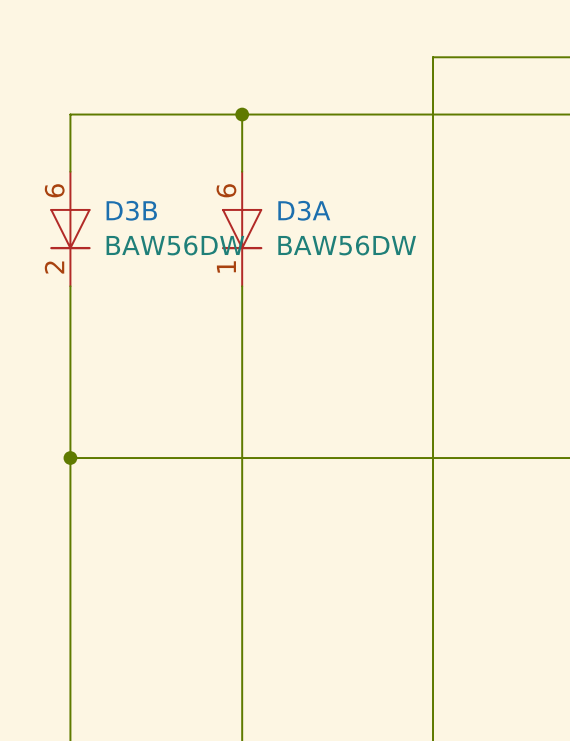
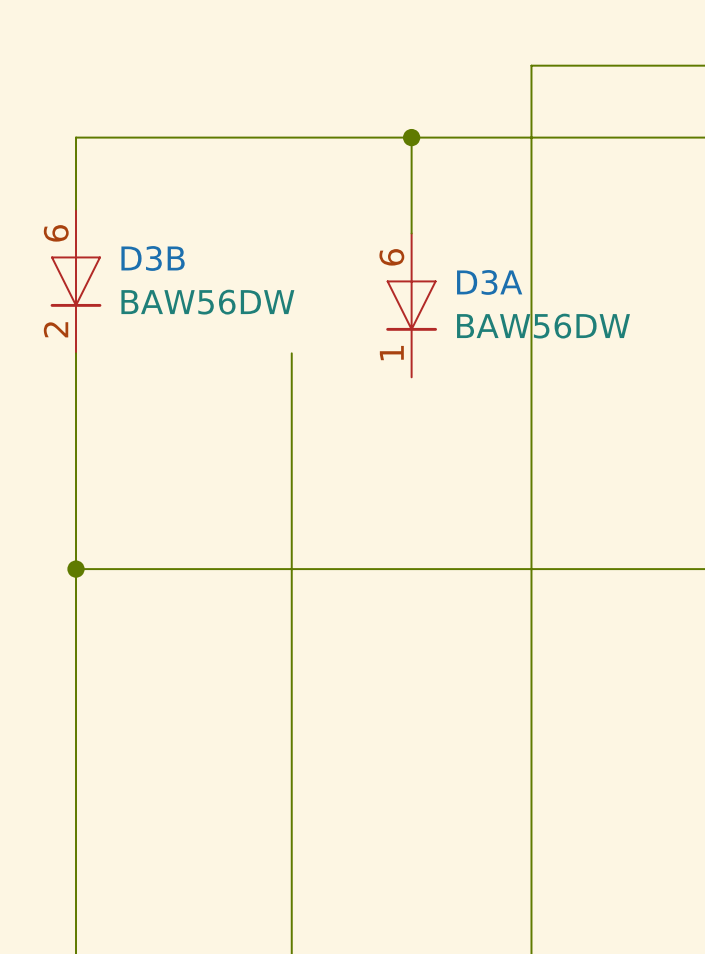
wire: (242, 114) (242, 171) -> none
junction: (242, 114) -> none
wire: none -> (411, 137) (411, 233)
junction: none -> (411, 137)
D3A position: (242, 229) -> (411, 305)

